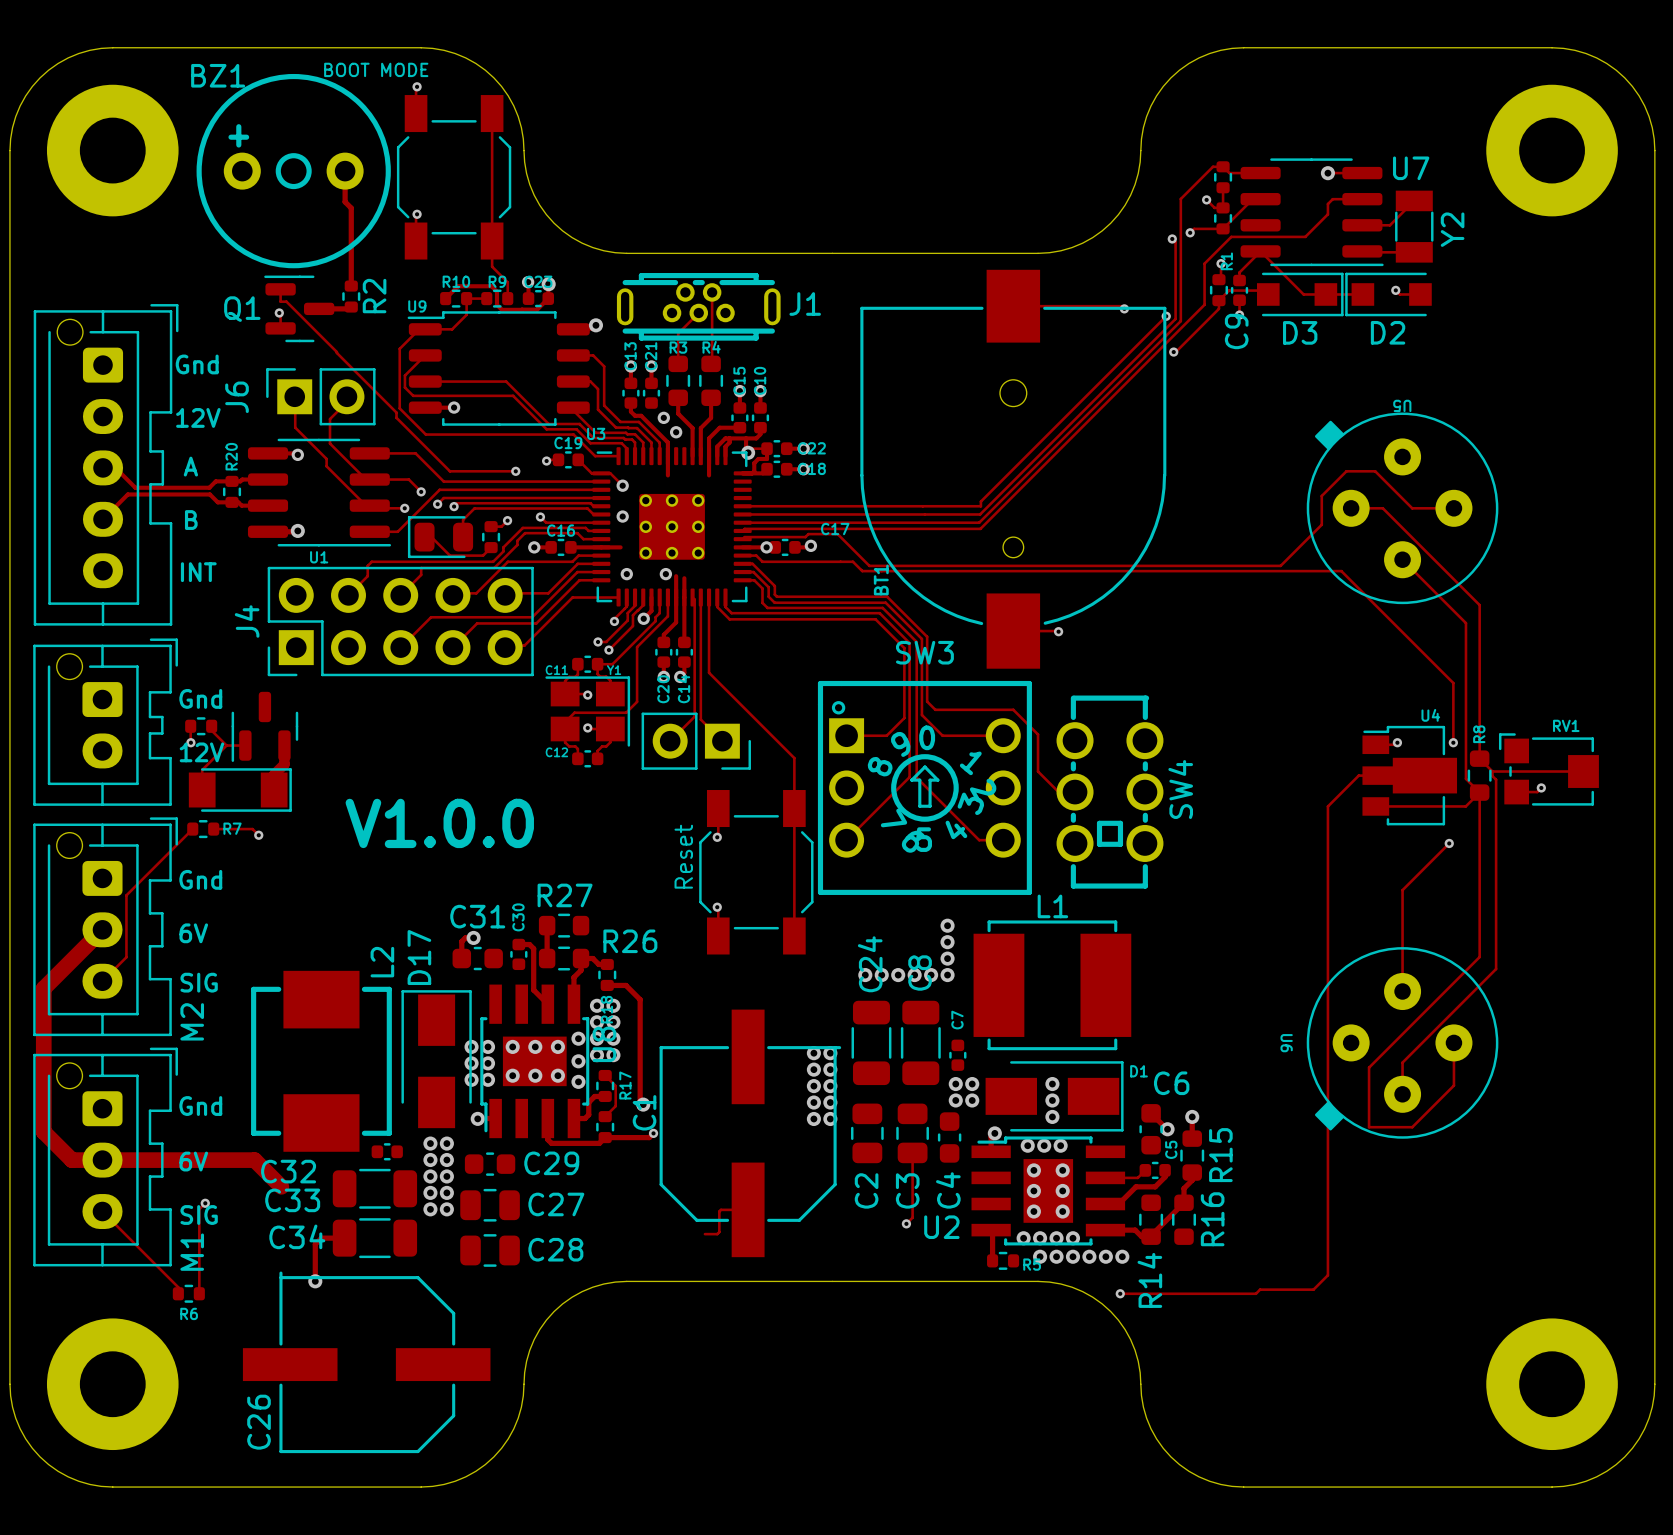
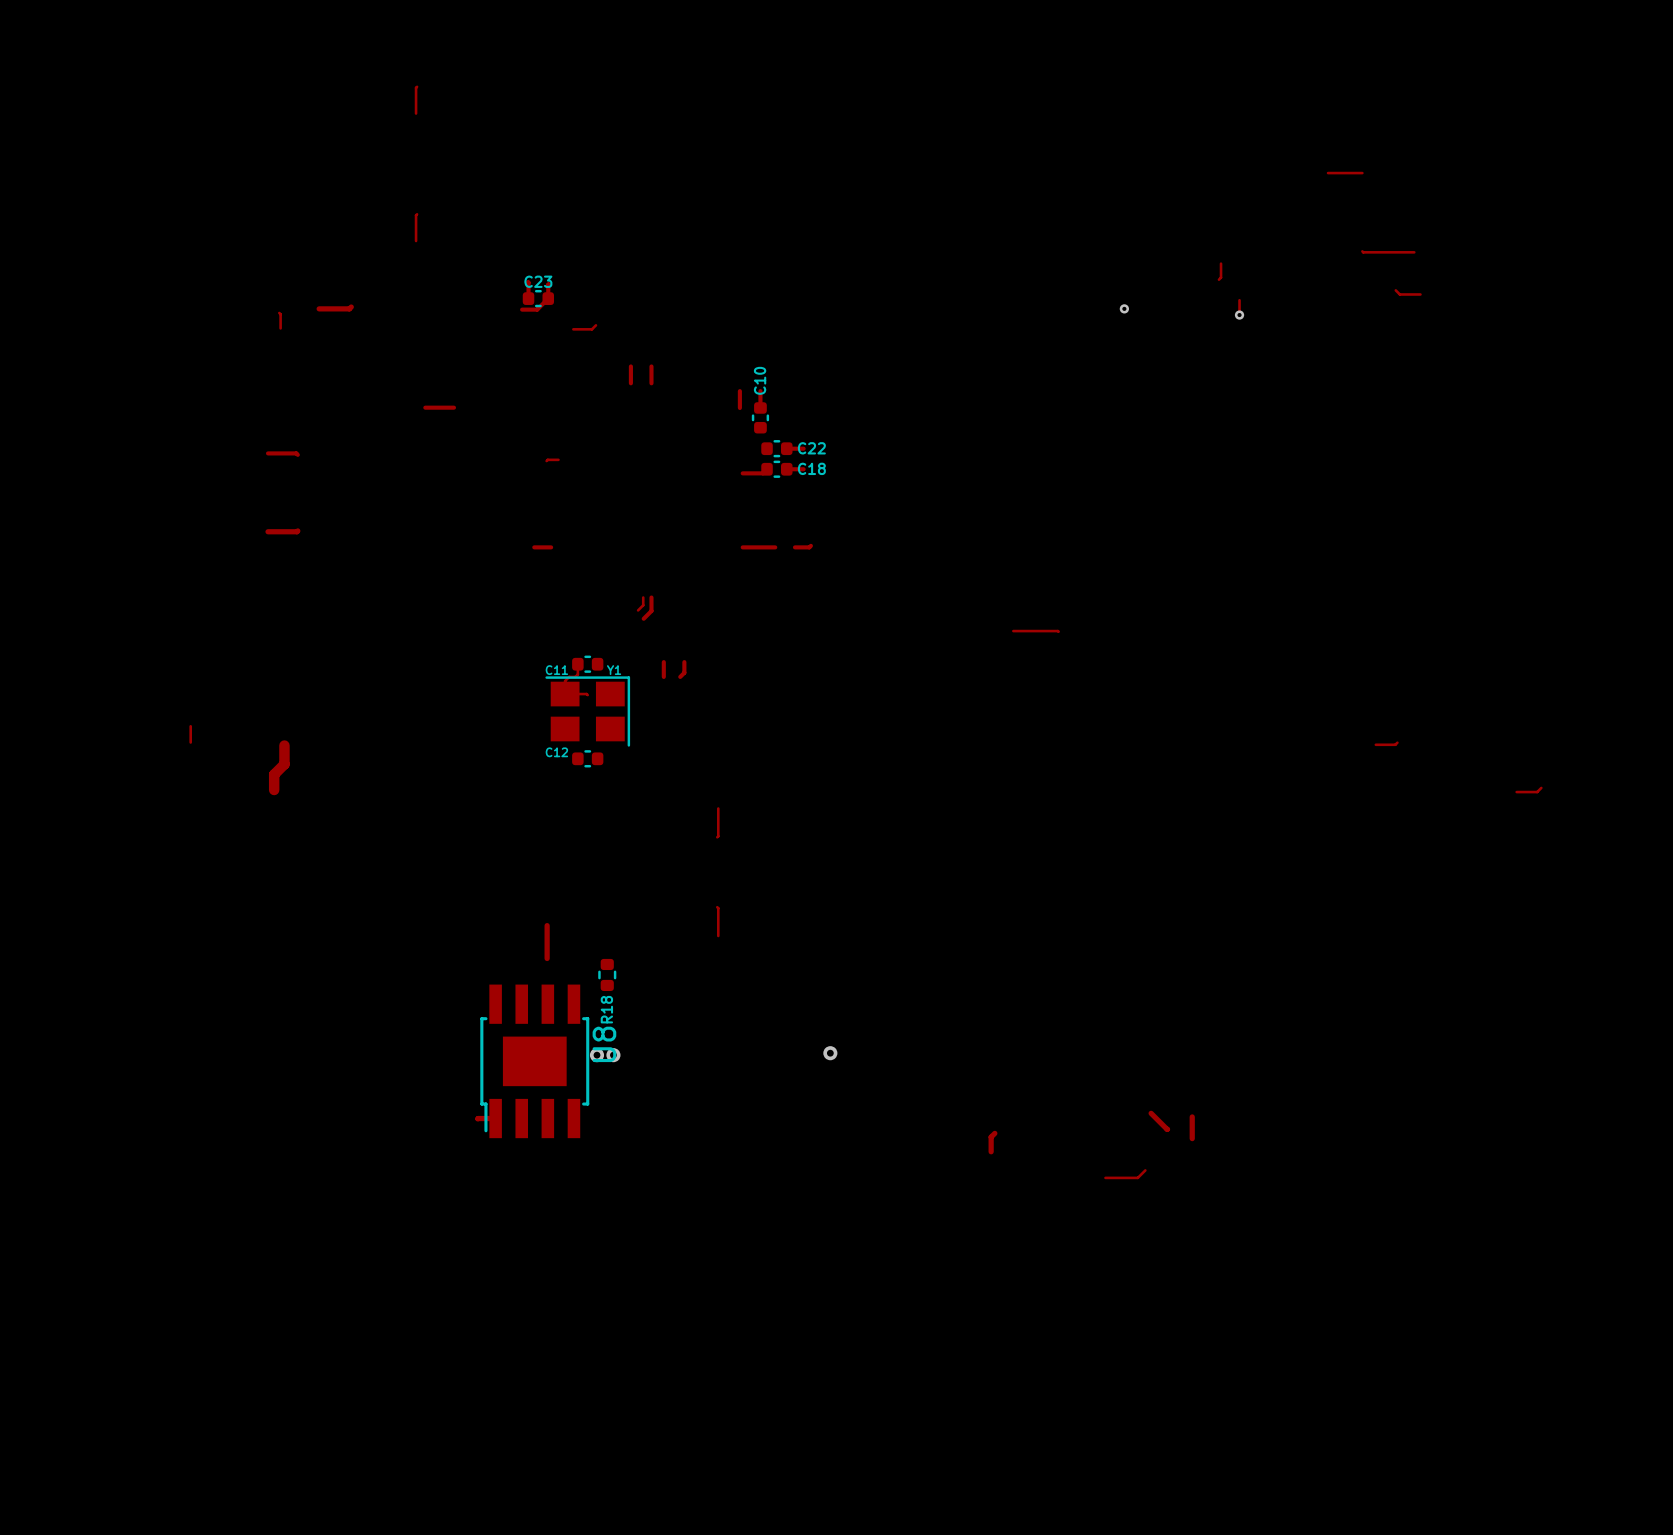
board edge: (112, 47) (421, 47) (455, 53) (485, 70) (508, 95) (521, 127) (524, 162) (529, 184) (546, 214) (562, 230) (582, 243) (603, 250) (626, 253) (1038, 253) (1071, 247) (1102, 230) (1125, 205) (1138, 173) (1141, 139) (1146, 116) (1163, 86) (1188, 63) (1220, 50) (1243, 47) (1563, 48) (1596, 57) (1624, 77) (1639, 95) (1649, 116) (1654, 150) (1654, 1384) (1652, 1407) (1644, 1428) (1624, 1456) (1596, 1476) (1563, 1486) (1243, 1487) (1220, 1484) (1188, 1471) (1163, 1448) (1146, 1418) (1141, 1395) (1138, 1361) (1125, 1329) (1102, 1303) (1071, 1287) (1038, 1281) (626, 1281) (603, 1284) (582, 1291) (562, 1303) (546, 1320) (529, 1350) (524, 1372) (521, 1407) (508, 1438) (485, 1464) (455, 1481) (421, 1487) (101, 1486) (68, 1476) (40, 1456) (20, 1428) (12, 1407) (9, 1384) (9, 150) (12, 127) (20, 105) (40, 77) (68, 57) (89, 50) (112, 47) -> none
text: BOOT MODE (376, 69) -> none
via: (417, 86) -> none
track: (492, 113) (492, 266) (507, 282) (507, 298) -> none
part: (112, 150) -> none
part: (1552, 150) -> none
BZ1: (293, 171) -> none
track: (345, 171) (345, 201) (351, 208) (351, 286) -> none
track: (1260, 173) (1229, 173) (1223, 166) (1213, 166) (1180, 198) (1180, 321) (979, 522) (742, 522) -> none
via: (1327, 173) -> none
part: (454, 177) -> none
part: (1223, 177) -> none
track: (1223, 187) (1223, 207) (1214, 207) (1206, 199) -> none
via: (1206, 199) -> none
track: (1260, 199) (1252, 199) (1223, 228) (1194, 228) (1190, 232) -> none
track: (1362, 199) (1332, 199) (1327, 204) (1327, 214) (1305, 236) (1231, 236) (1204, 263) (1204, 304) (980, 528) (744, 528) (742, 530) -> none
track: (1414, 200) (1389, 225) (1362, 225) -> none
U7: (1312, 212) -> none
via: (417, 214) -> none
part: (1223, 218) -> none
Y2: (1414, 226) -> none
via: (1190, 232) -> none
track: (1172, 238) (1175, 242) (1175, 318) (980, 514) (742, 514) -> none
via: (1172, 238) -> none
via: (1221, 263) -> none
track: (1239, 280) (1239, 272) (1260, 251) (1303, 294) (1362, 294) -> none
via: (528, 282) -> none
via: (548, 284) -> none
track: (280, 289) (280, 301) (286, 301) (336, 352) (396, 412) (396, 417) (449, 471) (515, 471) -> none
R1: (1218, 290) -> none
C9: (1239, 290) -> none
via: (1395, 290) -> none
track: (712, 292) (711, 363) -> none
track: (1268, 294) (1264, 290) (1229, 290) (1218, 300) (1218, 308) (1173, 352) -> none
D3: (1300, 294) -> none
D2: (1388, 294) -> none
R2: (351, 296) -> none
track: (445, 298) (457, 286) (491, 286) (496, 291) (496, 304) (501, 309) (521, 309) -> none
R10: (456, 298) -> none
track: (486, 298) (466, 298) (466, 314) (452, 329) (419, 329) (399, 348) (399, 408) (425, 434) (573, 434) (595, 456) (618, 456) -> none
R9: (497, 298) -> none
J1: (698, 306) -> none
track: (1013, 306) (1121, 306) (1124, 308) -> none
Q1: (299, 308) -> none
via: (279, 312) -> none
track: (698, 312) (678, 333) (678, 363) -> none
track: (1166, 316) (980, 501) (980, 506) (742, 506) -> none
via: (1166, 316) -> none
via: (595, 325) -> none
via: (1173, 352) -> none
track: (425, 355) (404, 375) (404, 387) (413, 395) (513, 395) (546, 429) (576, 429) (590, 443) (621, 443) (626, 448) (626, 456) -> none
track: (573, 355) (593, 355) (604, 366) (604, 405) (620, 421) (638, 421) (659, 442) (659, 456) -> none
text: Gnd (197, 364) -> none
via: (630, 366) -> none
via: (651, 366) -> none
U9: (498, 368) -> none
R3: (678, 380) -> none
R4: (711, 380) -> none
track: (425, 381) (506, 381) (548, 424) (579, 424) (593, 438) (632, 439) (635, 442) (635, 456) -> none
track: (573, 381) (590, 381) (598, 389) (598, 409) (615, 427) (637, 428) (651, 442) (651, 456) -> none
via: (739, 391) -> none
via: (760, 391) -> none
C13: (630, 393) -> none
C21: (651, 393) -> none
J6: (320, 396) -> none
track: (678, 397) (678, 413) (692, 428) (692, 456) -> none
track: (711, 397) (711, 417) (700, 428) (700, 456) -> none
track: (295, 401) (295, 427) (326, 458) (326, 466) (365, 505) (372, 508) (404, 508) -> none
track: (347, 401) (330, 419) (330, 443) (365, 479) (408, 479) (421, 491) -> none
track: (630, 403) (630, 411) (635, 415) (641, 415) (667, 442) (667, 475) -> none
via: (454, 407) -> none
track: (573, 407) (573, 410) (595, 432) (635, 434) (643, 442) (643, 456) -> none
text: 12V (198, 417) -> none
via: (663, 417) -> none
C15: (739, 417) -> none
track: (739, 427) (719, 427) (709, 438) (709, 475) -> none
track: (760, 427) (760, 434) (756, 438) (725, 438) (717, 446) (717, 456) -> none
via: (676, 432) -> none
track: (729, 438) (729, 442) (725, 446) (725, 456) -> none
track: (746, 438) (746, 450) (748, 452) (752, 448) (767, 448) (767, 458) (758, 458) (754, 463) (754, 471) (752, 473) -> none
via: (803, 448) -> none
via: (748, 452) -> none
track: (369, 453) (415, 453) (443, 481) (601, 481) -> none
via: (297, 454) -> none
C19: (568, 459) -> none
track: (578, 459) (591, 473) (610, 473) (622, 485) -> none
via: (546, 461) -> none
part: (106, 464) -> none
text: A (190, 466) -> none
track: (103, 467) (115, 467) (135, 487) (209, 487) (215, 481) (268, 479) -> none
via: (803, 469) -> none
BT1: (1013, 469) -> none
via: (515, 471) -> none
via: (622, 485) -> none
track: (601, 489) (439, 489) (397, 531) (369, 531) -> none
R20: (232, 491) -> none
via: (421, 491) -> none
U1: (319, 492) -> none
track: (601, 498) (443, 498) (437, 504) -> none
via: (437, 504) -> none
track: (268, 505) (241, 505) (238, 502) (217, 502) (209, 494) (127, 494) (103, 519) -> none
via: (454, 506) -> none
track: (601, 506) (593, 506) (590, 503) (457, 503) (454, 506) -> none
via: (404, 508) -> none
track: (1351, 508) (1382, 508) (1479, 605) (1479, 758) (1492, 771) -> none
U5: (1402, 508) -> none
track: (1453, 508) (1412, 508) (1375, 471) (1346, 471) (1321, 495) (1321, 524) (1280, 565) (869, 565) (837, 534) (808, 534) (805, 537) (744, 537) (742, 539) -> none
track: (601, 514) (593, 514) (587, 508) (474, 508) (463, 519) (463, 537) -> none
via: (622, 516) -> none
track: (540, 517) (546, 522) (601, 522) -> none
via: (540, 517) -> none
text: B (191, 520) -> none
track: (507, 520) (501, 526) (491, 526) -> none
via: (507, 520) -> none
U3: (672, 526) -> none
via: (297, 530) -> none
track: (601, 530) (588, 530) (585, 527) (522, 527) (503, 547) (503, 551) (493, 561) (371, 561) (367, 565) (367, 576) (350, 593) -> none
track: (424, 537) (431, 537) (449, 555) (483, 555) (491, 547) -> none
part: (440, 537) -> none
part: (491, 537) -> none
track: (601, 539) (583, 539) (577, 533) (525, 533) (517, 540) (517, 544) (494, 567) (421, 567) (421, 574) (402, 593) -> none
via: (810, 545) -> none
via: (534, 547) -> none
C16: (561, 547) -> none
track: (570, 547) (620, 547) -> none
via: (766, 547) -> none
C17: (785, 547) -> none
track: (601, 555) (578, 555) (572, 561) (507, 561) (476, 593) (455, 593) -> none
track: (742, 555) (756, 555) (762, 561) (852, 561) (862, 571) (1341, 571) (1453, 683) (1453, 742) -> none
track: (1402, 559) (1465, 623) (1465, 778) (1479, 792) -> none
track: (601, 563) (577, 563) (548, 593) (507, 593) -> none
track: (742, 563) (752, 563) (774, 586) (774, 594) (776, 596) (887, 596) (927, 636) (927, 701) (935, 709) (1013, 709) (1038, 734) (1038, 771) (1058, 792) (1075, 792) -> none
text: INT (198, 572) -> none
track: (601, 572) (577, 572) (532, 617) (431, 617) (400, 647) -> none
track: (742, 572) (753, 572) (768, 587) (768, 596) (774, 602) (885, 602) (921, 638) (921, 715) (942, 735) (1003, 735) -> none
via: (626, 574) -> none
via: (665, 574) -> none
track: (676, 576) (676, 622) (663, 634) (663, 642) -> none
track: (684, 578) (684, 642) -> none
track: (601, 580) (579, 580) (536, 623) (477, 623) (452, 647) -> none
track: (742, 580) (754, 580) (762, 588) (762, 602) (767, 607) (882, 607) (916, 641) (916, 777) (979, 840) (1003, 840) -> none
track: (618, 597) (572, 597) (524, 645) (507, 645) -> none
track: (626, 597) (626, 606) (614, 618) (614, 621) -> none
track: (635, 597) (635, 605) (627, 613) (627, 620) (606, 641) (598, 641) -> none
track: (659, 597) (659, 613) (655, 617) (655, 621) (612, 664) (597, 664) (597, 674) (600, 676) (606, 676) (610, 680) (610, 694) -> none
track: (667, 597) (667, 616) (637, 647) (637, 701) (626, 712) (574, 712) (565, 722) (565, 742) (569, 746) (575, 746) (577, 748) (577, 758) -> none
track: (692, 597) (694, 599) (694, 716) (670, 741) -> none
track: (700, 597) (700, 719) (722, 741) -> none
track: (709, 597) (709, 672) (794, 758) (794, 935) -> none
track: (717, 597) (717, 607) (729, 619) (875, 619) (904, 648) (904, 718) (886, 735) (846, 735) -> none
track: (725, 597) (725, 607) (731, 613) (879, 613) (909, 643) (909, 777) (846, 840) -> none
track: (637, 610) (632, 615) (632, 626) (608, 650) -> none
via: (643, 618) -> none
J4: (400, 621) -> none
via: (614, 621) -> none
via: (1058, 631) -> none
via: (598, 641) -> none
via: (608, 650) -> none
C20: (663, 652) -> none
C14: (684, 652) -> none
via: (663, 676) -> none
via: (680, 676) -> none
via: (587, 695) -> none
text: Gnd (200, 698) -> none
part: (105, 722) -> none
part: (201, 726) -> none
track: (211, 726) (211, 730) (226, 745) -> none
part: (264, 726) -> none
track: (587, 727) (610, 728) (610, 742) (597, 750) (597, 758) -> none
via: (587, 727) -> none
part: (696, 741) -> none
via: (190, 742) -> none
via: (1397, 742) -> none
via: (1453, 742) -> none
track: (226, 745) (245, 745) -> none
track: (226, 745) (202, 769) (202, 790) -> none
text: 12V (201, 752) -> none
RV1: (1548, 769) -> none
track: (1492, 771) (1492, 776) (1496, 779) (1496, 969) (1402, 1062) (1402, 1094) -> none
track: (1492, 771) (1583, 771) -> none
track: (1377, 775) (1358, 775) (1327, 806) (1327, 1275) (1313, 1289) (1260, 1289) (1255, 1293) (1120, 1293) -> none
U4: (1409, 775) -> none
R8: (1479, 775) -> none
SW3: (924, 787) -> none
via: (1541, 787) -> none
part: (240, 790) -> none
SW4: (1109, 792) -> none
track: (1479, 792) (1465, 806) (1375, 806) -> none
track: (1479, 792) (1479, 957) (1369, 1067) (1369, 1127) (1412, 1127) (1453, 1085) (1453, 1042) -> none
text: V1.0.0 (439, 823) -> none
track: (192, 829) (126, 895) (126, 957) (102, 981) -> none
R7: (203, 829) -> none
track: (213, 829) (252, 829) (258, 835) -> none
via: (258, 835) -> none
via: (717, 837) -> none
track: (1449, 843) (1402, 890) (1402, 991) -> none
via: (1449, 843) -> none
text: Reset (683, 856) -> none
part: (756, 872) -> none
text: Gnd (200, 879) -> none
via: (717, 907) -> none
R27: (564, 925) -> none
via: (947, 925) -> none
M2: (105, 926) -> none
track: (102, 929) (43, 988) (43, 1131) (71, 1160) (254, 1160) (281, 1186) -> none
text: 6V (193, 933) -> none
track: (473, 937) (465, 937) (461, 941) (461, 958) -> none
via: (473, 937) -> none
via: (947, 942) -> none
track: (518, 944) (529, 944) (533, 948) (533, 990) (547, 1004) -> none
C30: (518, 954) -> none
C31: (477, 958) -> none
R26: (564, 958) -> none
via: (947, 958) -> none
track: (607, 964) (598, 964) (592, 958) (581, 958) (581, 970) (573, 977) (573, 1004) -> none
via: (865, 975) -> none
via: (881, 975) -> none
via: (898, 975) -> none
via: (914, 975) -> none
via: (931, 975) -> none
via: (947, 975) -> none
text: SIG (199, 982) -> none
track: (607, 985) (625, 985) (640, 999) (640, 1101) (643, 1104) -> none
L1: (1052, 985) -> none
via: (596, 1005) -> none
via: (613, 1005) -> none
via: (596, 1022) -> none
via: (613, 1022) -> none
via: (578, 1038) -> none
via: (596, 1038) -> none
via: (613, 1038) -> none
C24: (871, 1042) -> none
C8: (920, 1042) -> none
U6: (1402, 1042) -> none
via: (471, 1046) -> none
via: (488, 1046) -> none
via: (512, 1046) -> none
via: (535, 1046) -> none
via: (557, 1046) -> none
via: (813, 1053) -> none
C7: (957, 1055) -> none
D17: (436, 1059) -> none
L2: (321, 1061) -> none
via: (578, 1061) -> none
via: (471, 1063) -> none
via: (488, 1063) -> none
via: (813, 1069) -> none
via: (830, 1069) -> none
via: (512, 1075) -> none
via: (535, 1075) -> none
via: (557, 1075) -> none
track: (605, 1075) (615, 1085) (615, 1106) (605, 1116) -> none
via: (471, 1079) -> none
via: (488, 1079) -> none
via: (578, 1081) -> none
via: (955, 1084) -> none
via: (972, 1084) -> none
via: (1052, 1084) -> none
R17: (605, 1085) -> none
via: (813, 1086) -> none
via: (830, 1086) -> none
track: (605, 1096) (594, 1096) (588, 1102) (588, 1114) (585, 1118) (573, 1118) -> none
D1: (1054, 1096) -> none
via: (955, 1100) -> none
via: (972, 1100) -> none
via: (1052, 1100) -> none
via: (813, 1102) -> none
via: (830, 1102) -> none
via: (643, 1104) -> none
text: Gnd (200, 1106) -> none
via: (1052, 1116) -> none
via: (1192, 1116) -> none
via: (477, 1118) -> none
track: (547, 1118) (547, 1139) (551, 1143) (599, 1143) (605, 1137) (649, 1137) (653, 1133) -> none
via: (813, 1118) -> none
via: (830, 1118) -> none
part: (605, 1127) -> none
C6: (1151, 1129) -> none
via: (1167, 1129) -> none
via: (653, 1133) -> none
C1: (750, 1133) -> none
C2: (867, 1133) -> none
C3: (912, 1133) -> none
via: (994, 1133) -> none
C4: (949, 1137) -> none
via: (430, 1143) -> none
via: (446, 1143) -> none
via: (1027, 1145) -> none
via: (1044, 1145) -> none
via: (1060, 1145) -> none
C32: (387, 1151) -> none
track: (912, 1152) (912, 1217) (906, 1223) -> none
R15: (1192, 1155) -> none
M1: (105, 1157) -> none
via: (430, 1160) -> none
via: (446, 1160) -> none
text: 6V (193, 1161) -> none
C29: (490, 1164) -> none
via: (1033, 1170) -> none
via: (1062, 1170) -> none
C5: (1155, 1170) -> none
track: (1165, 1170) (1165, 1176) (1155, 1186) (1136, 1186) (1118, 1204) (1105, 1204) -> none
track: (1192, 1172) (1192, 1180) (1184, 1188) (1184, 1202) (1151, 1236) (1141, 1236) (1135, 1230) (1105, 1230) -> none
via: (430, 1176) -> none
via: (446, 1176) -> none
C33: (374, 1188) -> none
via: (1033, 1190) -> none
U2: (1048, 1190) -> none
via: (1062, 1190) -> none
via: (430, 1192) -> none
via: (446, 1192) -> none
track: (205, 1203) (199, 1209) (199, 1293) -> none
via: (205, 1203) -> none
C27: (490, 1205) -> none
via: (430, 1209) -> none
via: (446, 1209) -> none
track: (748, 1209) (720, 1209) (719, 1211) (719, 1232) (717, 1234) (704, 1234) -> none
track: (102, 1211) (178, 1287) (178, 1293) -> none
via: (1033, 1211) -> none
via: (1062, 1211) -> none
text: SIG (199, 1215) -> none
R14: (1151, 1219) -> none
R16: (1184, 1219) -> none
via: (906, 1223) -> none
track: (991, 1230) (992, 1260) -> none
track: (344, 1238) (321, 1238) (315, 1244) (315, 1281) -> none
C34: (374, 1238) -> none
via: (1023, 1238) -> none
via: (1040, 1238) -> none
via: (1056, 1238) -> none
via: (1072, 1238) -> none
C28: (490, 1250) -> none
via: (1040, 1256) -> none
via: (1056, 1256) -> none
via: (1072, 1256) -> none
via: (1089, 1256) -> none
via: (1105, 1256) -> none
via: (1122, 1256) -> none
R5: (1003, 1260) -> none
via: (315, 1281) -> none
R6: (188, 1293) -> none
via: (1120, 1293) -> none
C26: (366, 1362) -> none
part: (112, 1384) -> none
part: (1552, 1384) -> none

